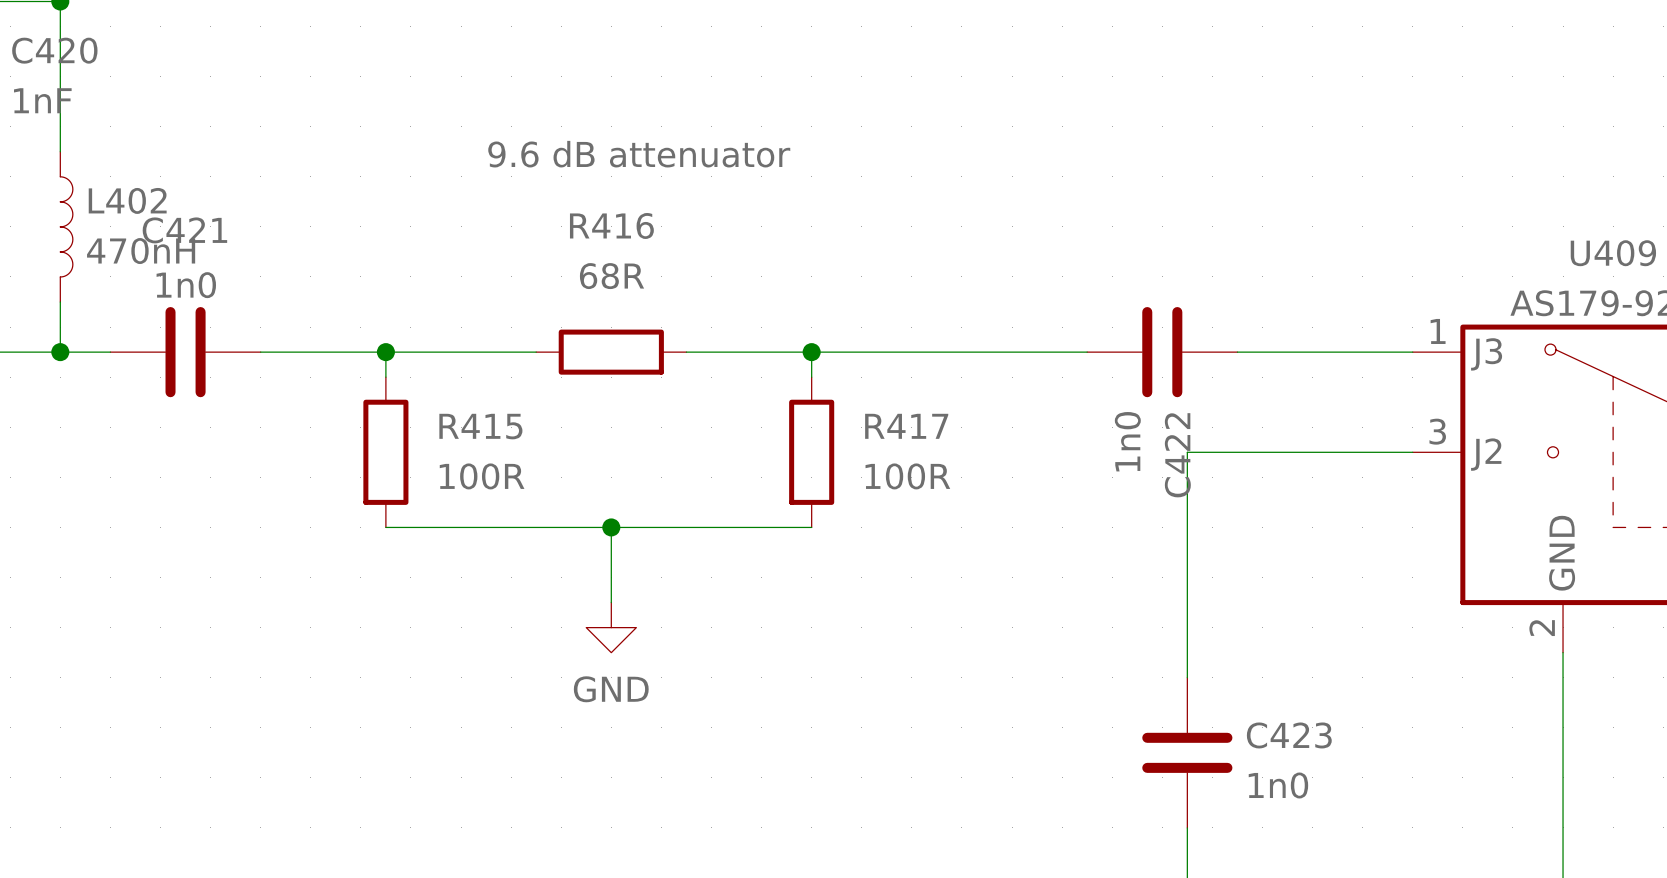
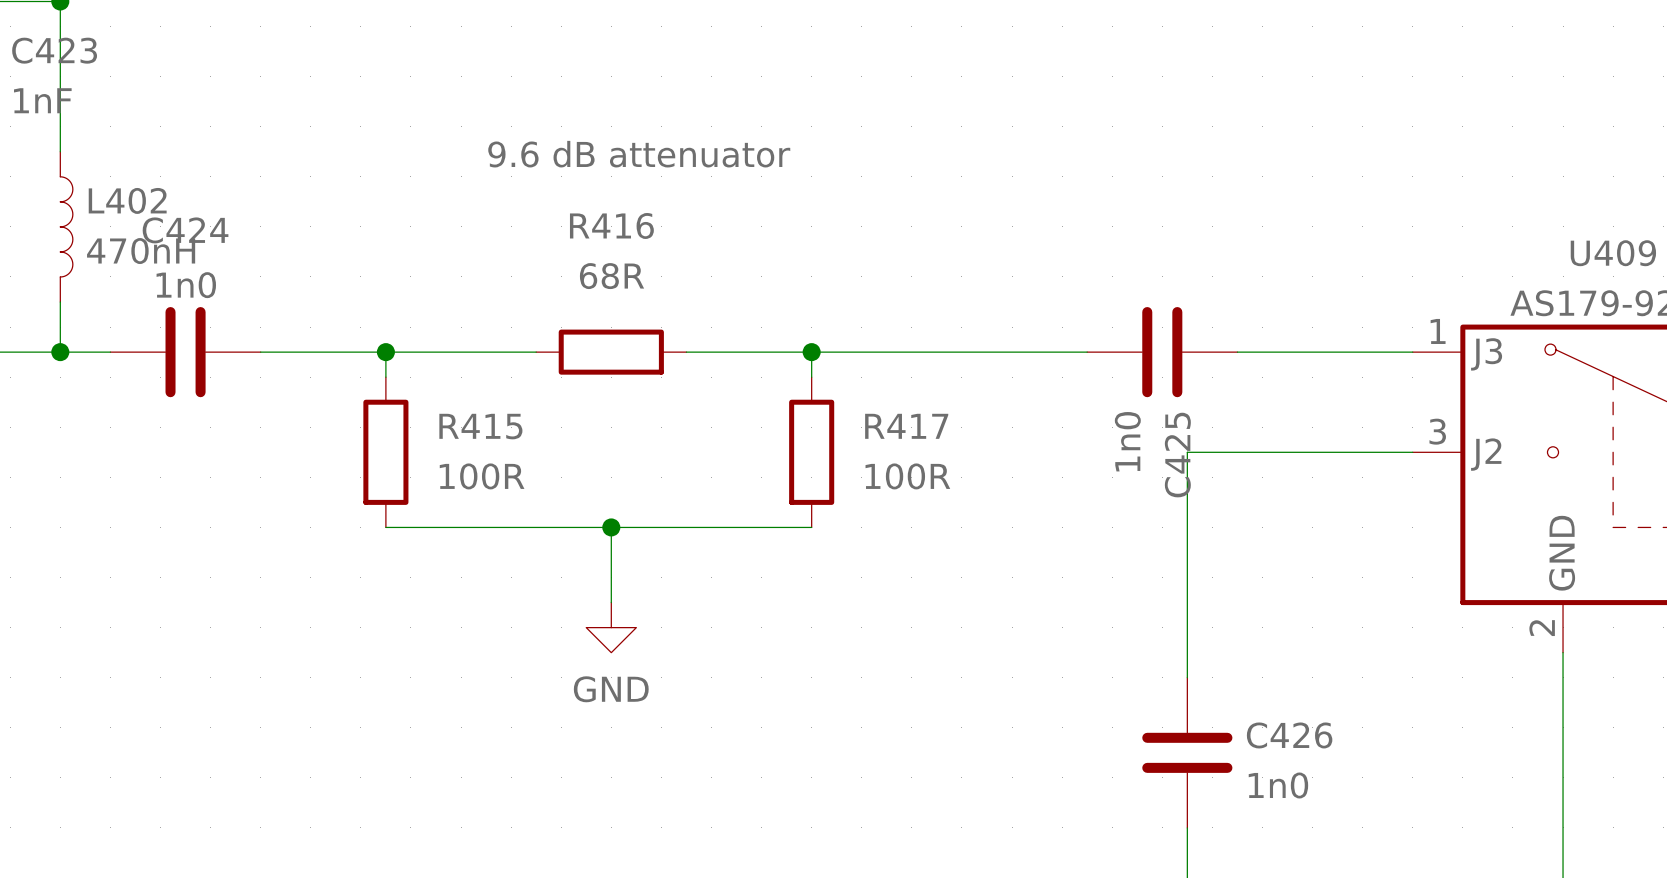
C420 name: C420 (54, 50) -> C423 (54, 50)
C421 name: C421 (184, 230) -> C424 (185, 230)
C422 name: C422 (1177, 455) -> C425 (1177, 455)
C423 name: C423 (1289, 735) -> C426 (1289, 735)

